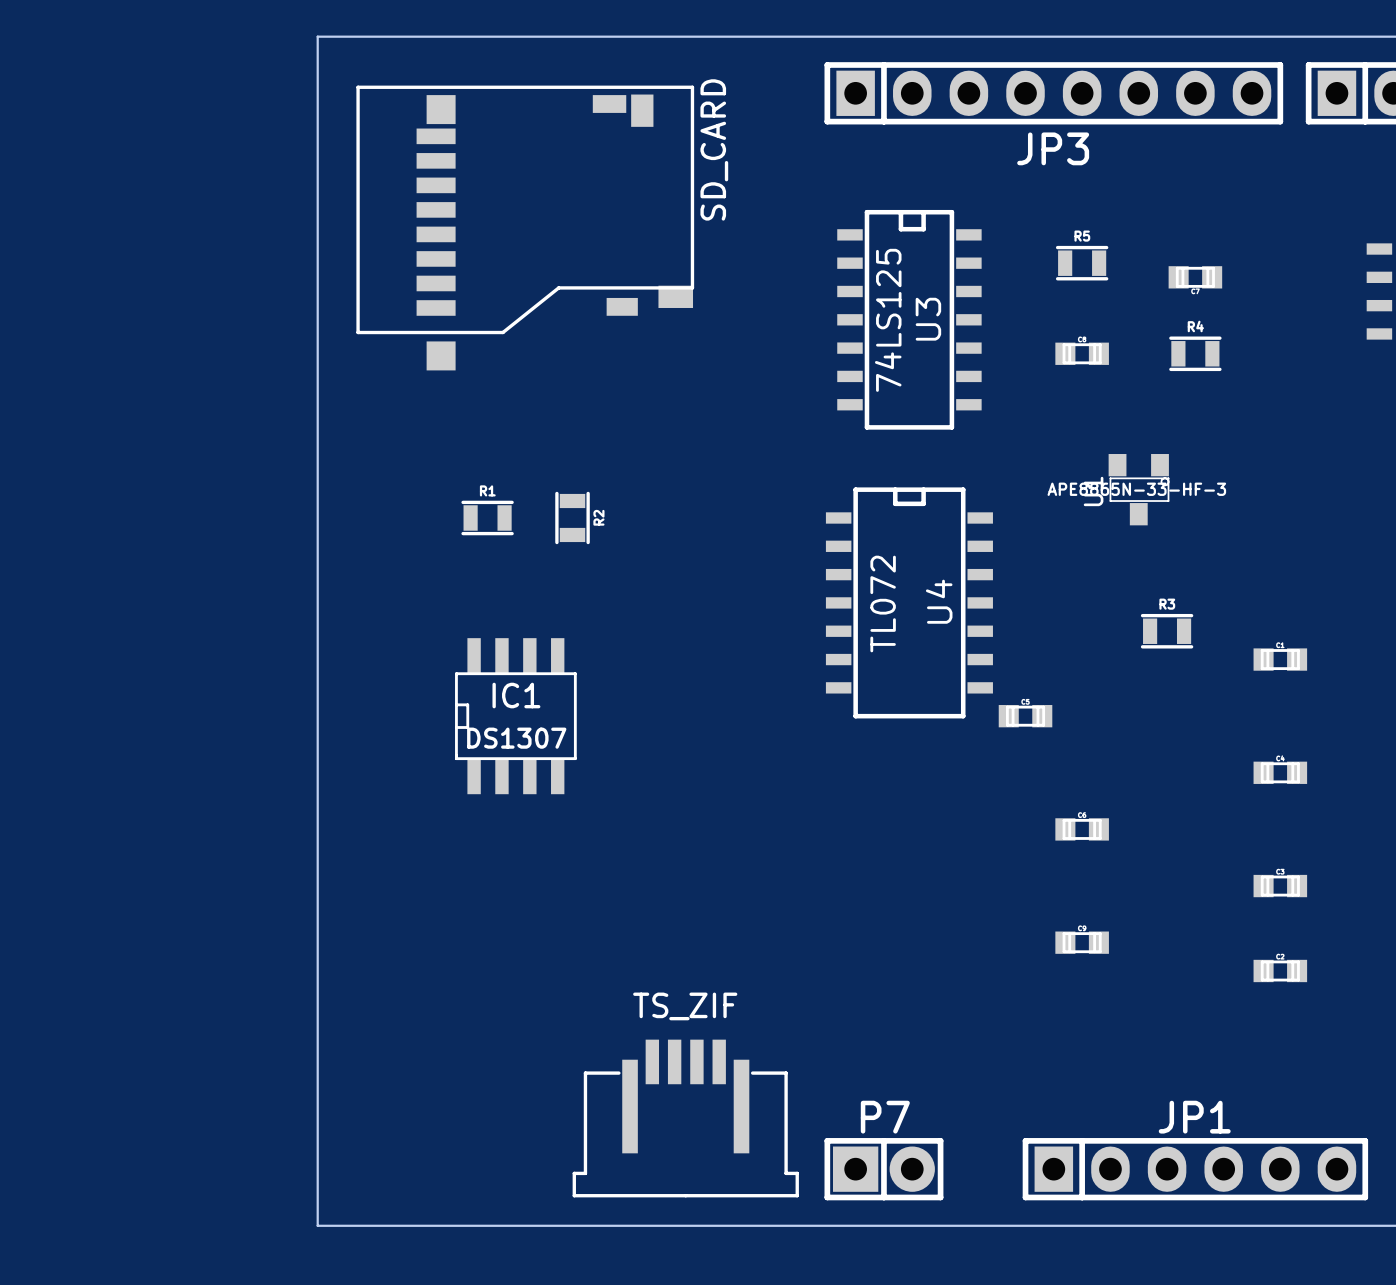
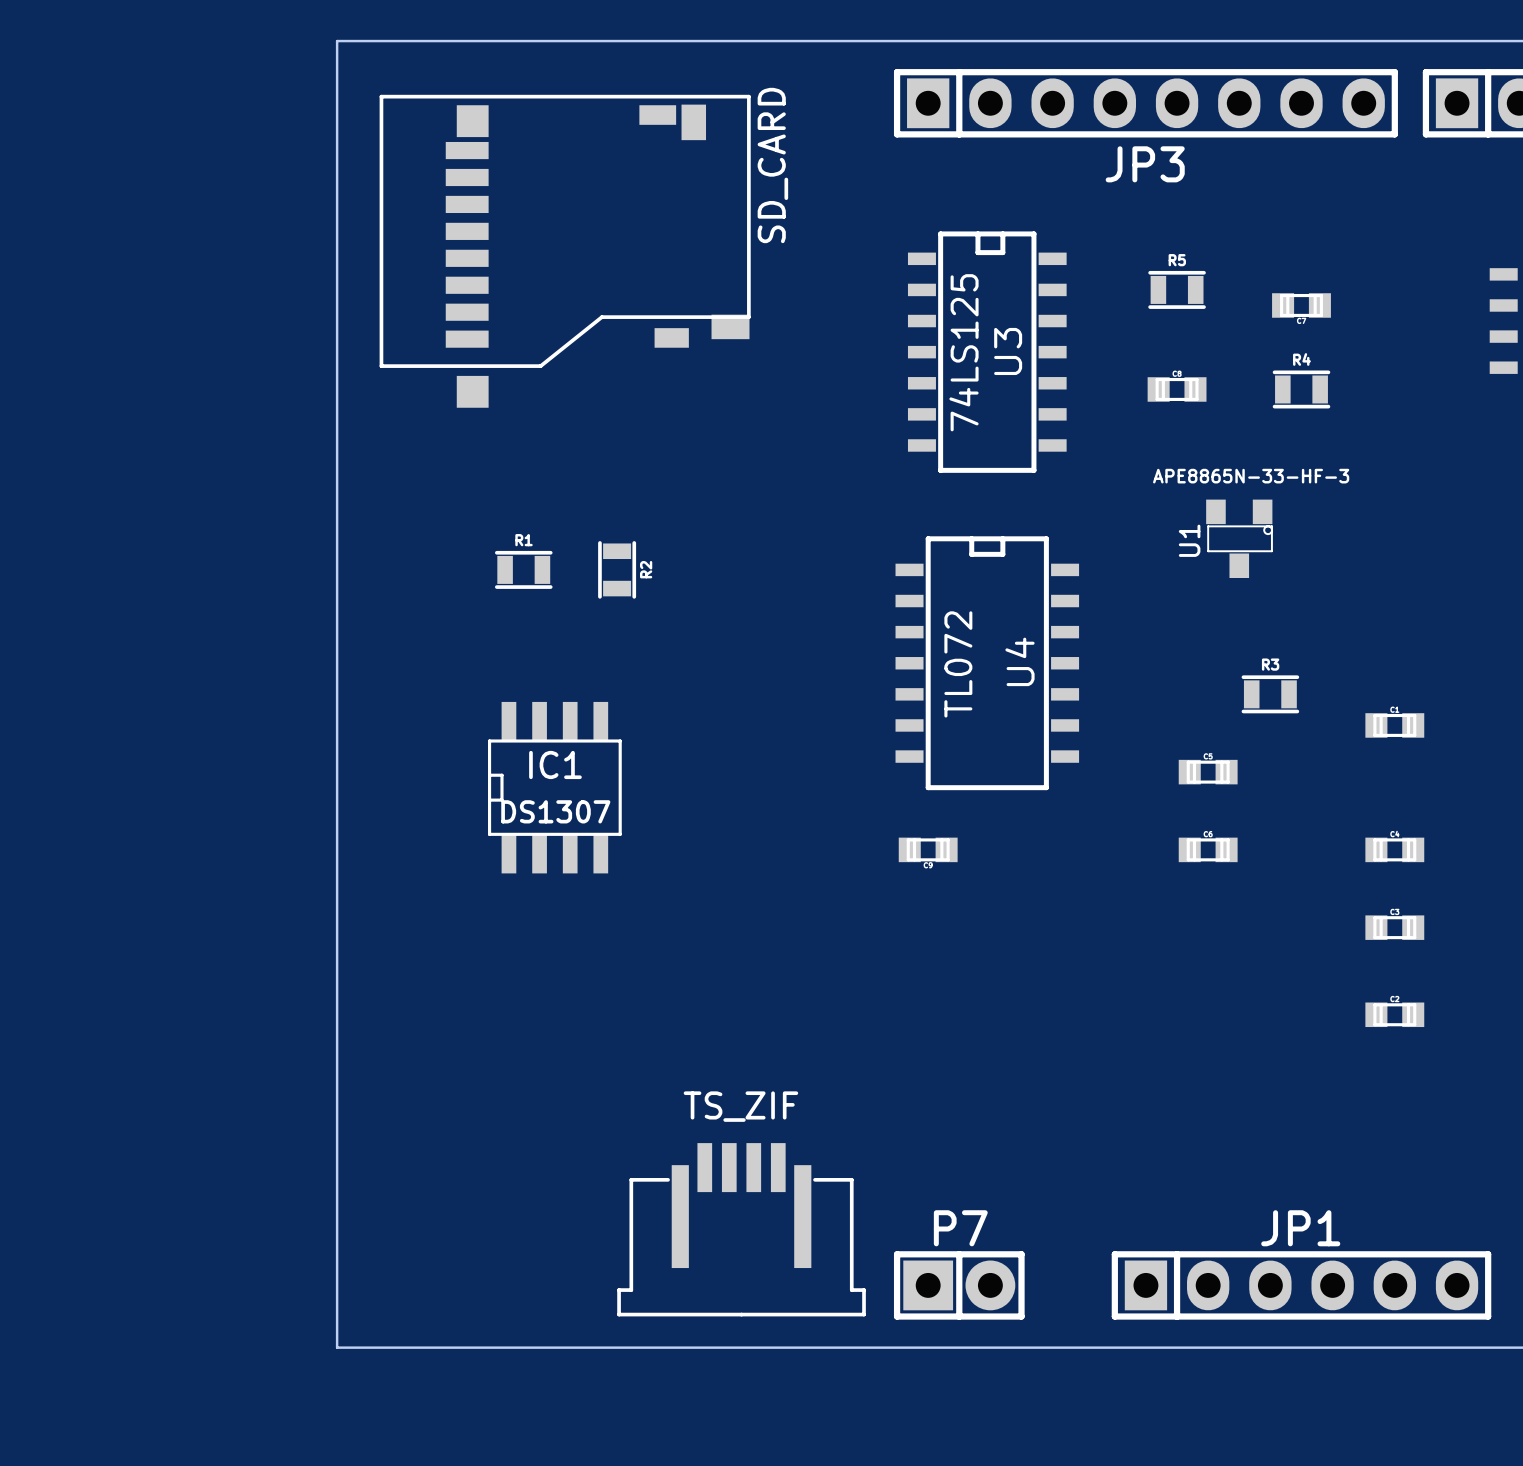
U1 value position: APE8865N-33-HF-3 (1136, 489) -> APE8865N-33-HF-3 (1251, 476)
part position: (1025, 716) -> (1208, 772)
part position: (1082, 829) -> (1208, 849)
part position: (1280, 886) -> (1394, 927)
part rotation: 0° (1082, 942) -> 180° (928, 849)
part position: (1082, 942) -> (928, 849)
part position: (1280, 970) -> (1394, 1014)

